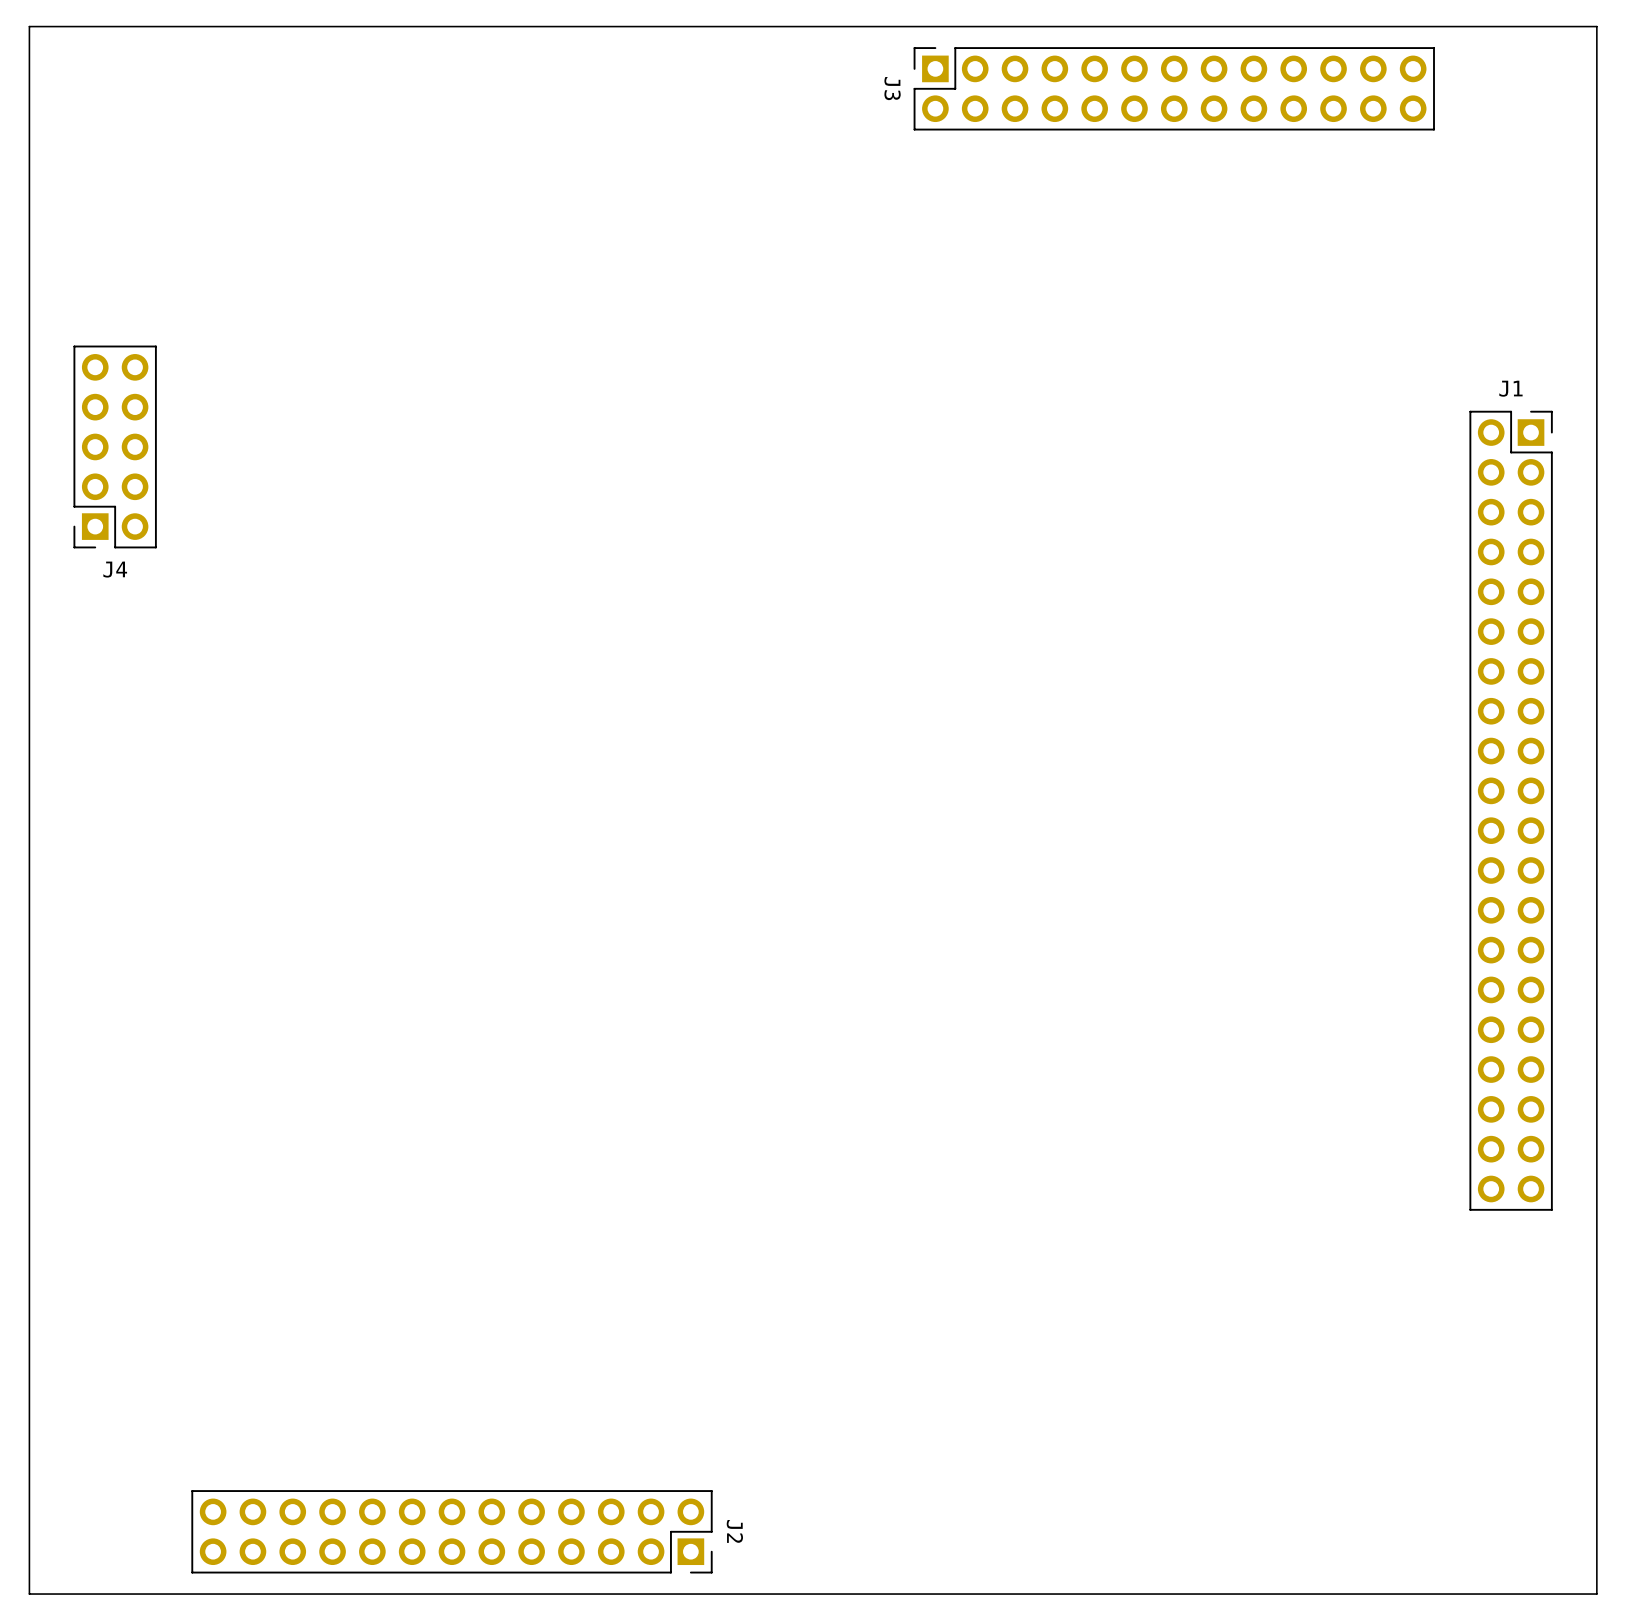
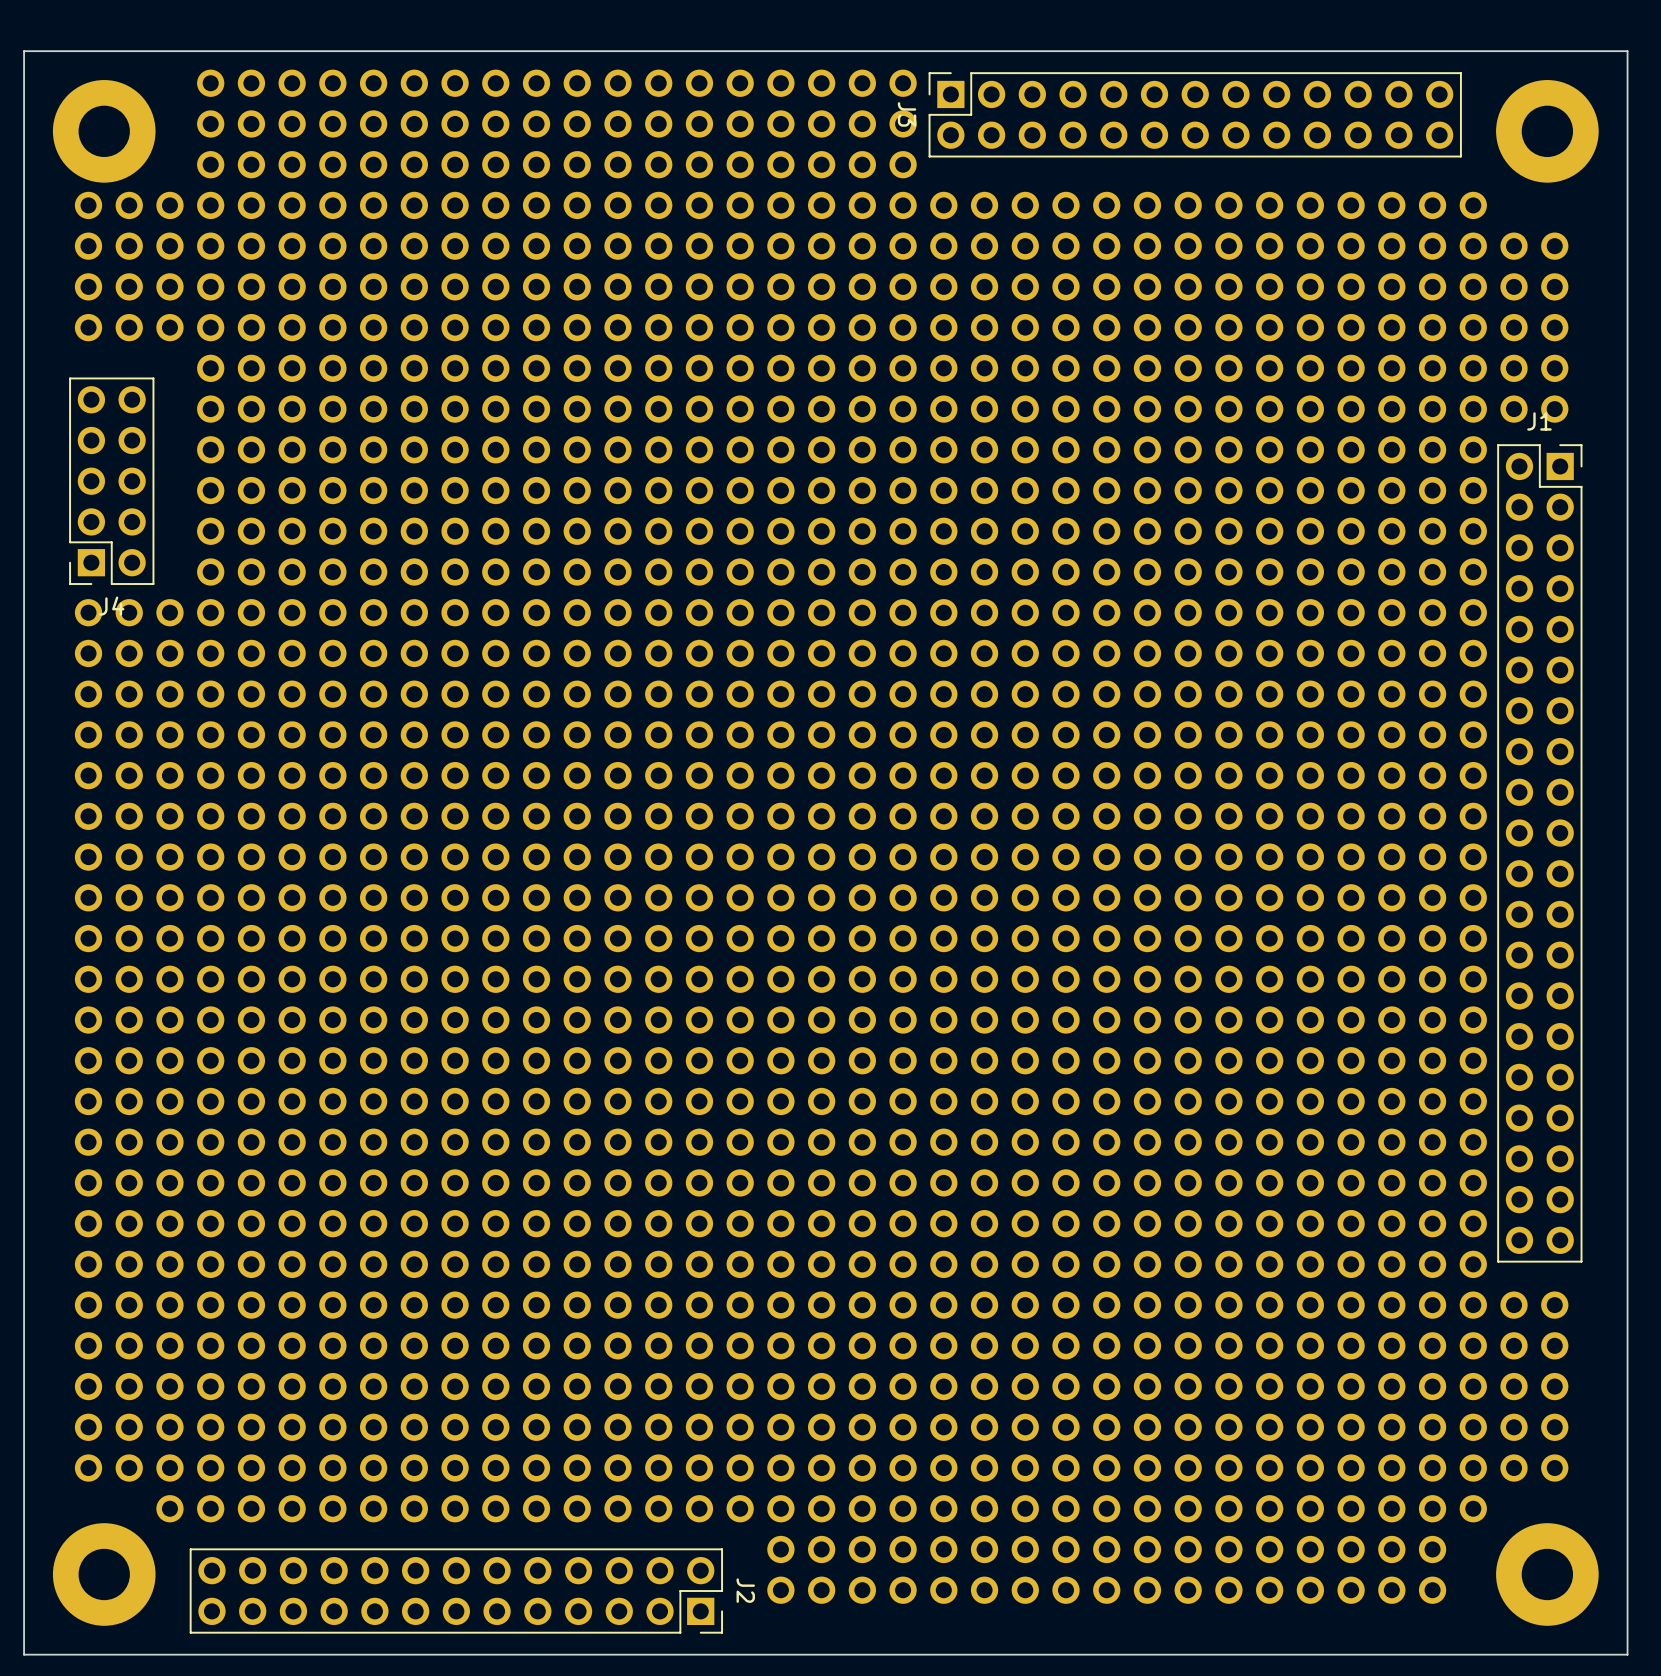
part: none -> (104, 131)
part: none -> (1547, 131)
part: none -> (821, 836)
part: none -> (104, 1574)
part: none -> (1547, 1574)

